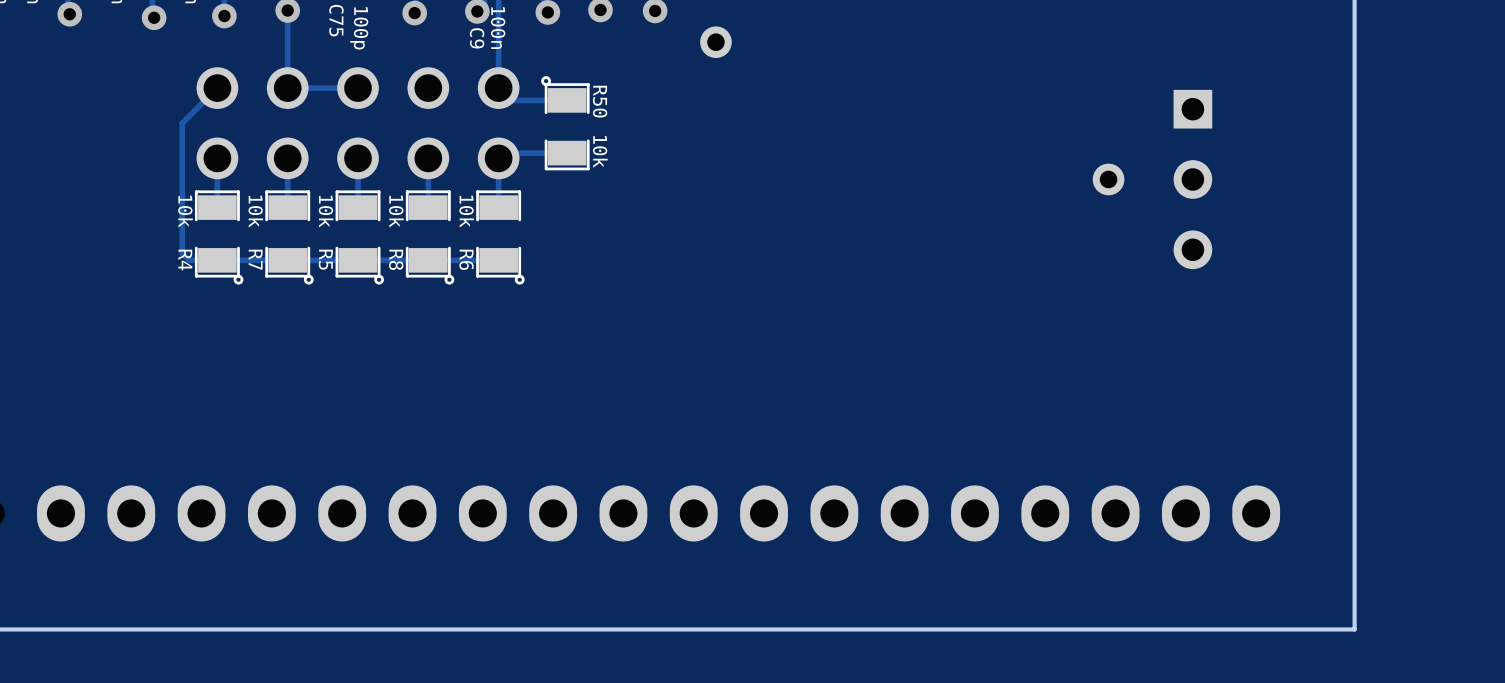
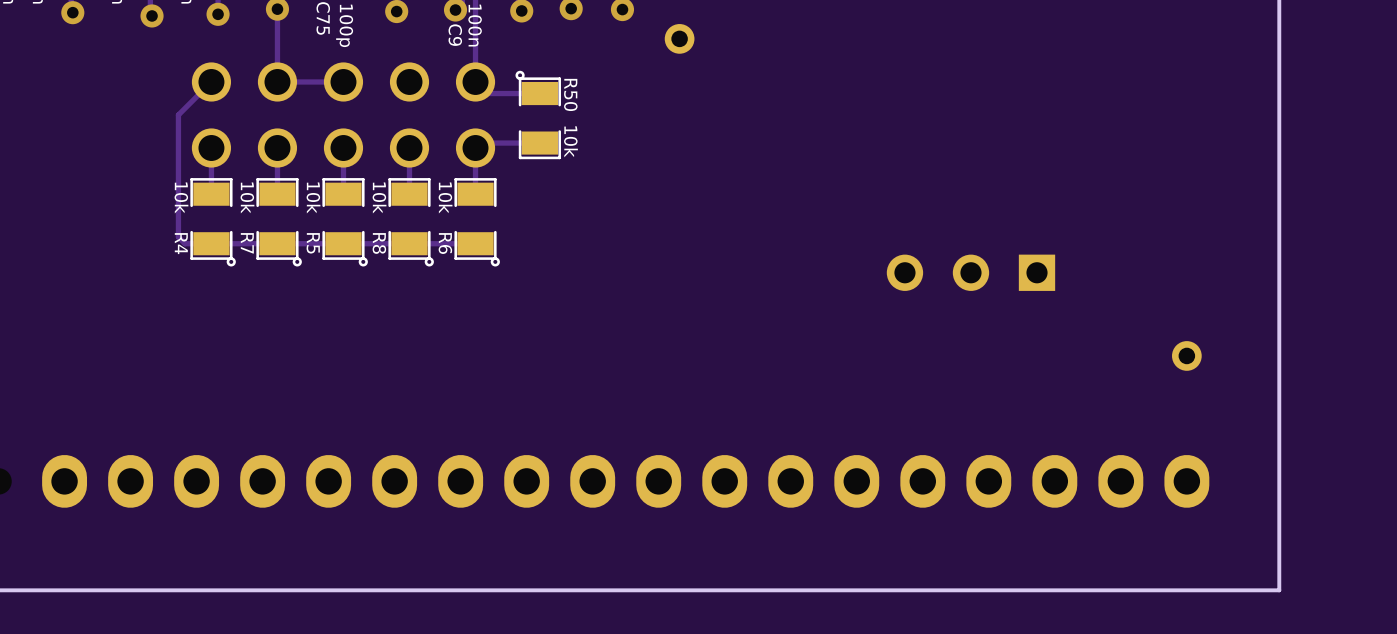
part position: (1108, 179) -> (1186, 355)
part rotation: 0° (1192, 179) -> 90° clockwise (970, 272)
part position: (1192, 179) -> (970, 272)

